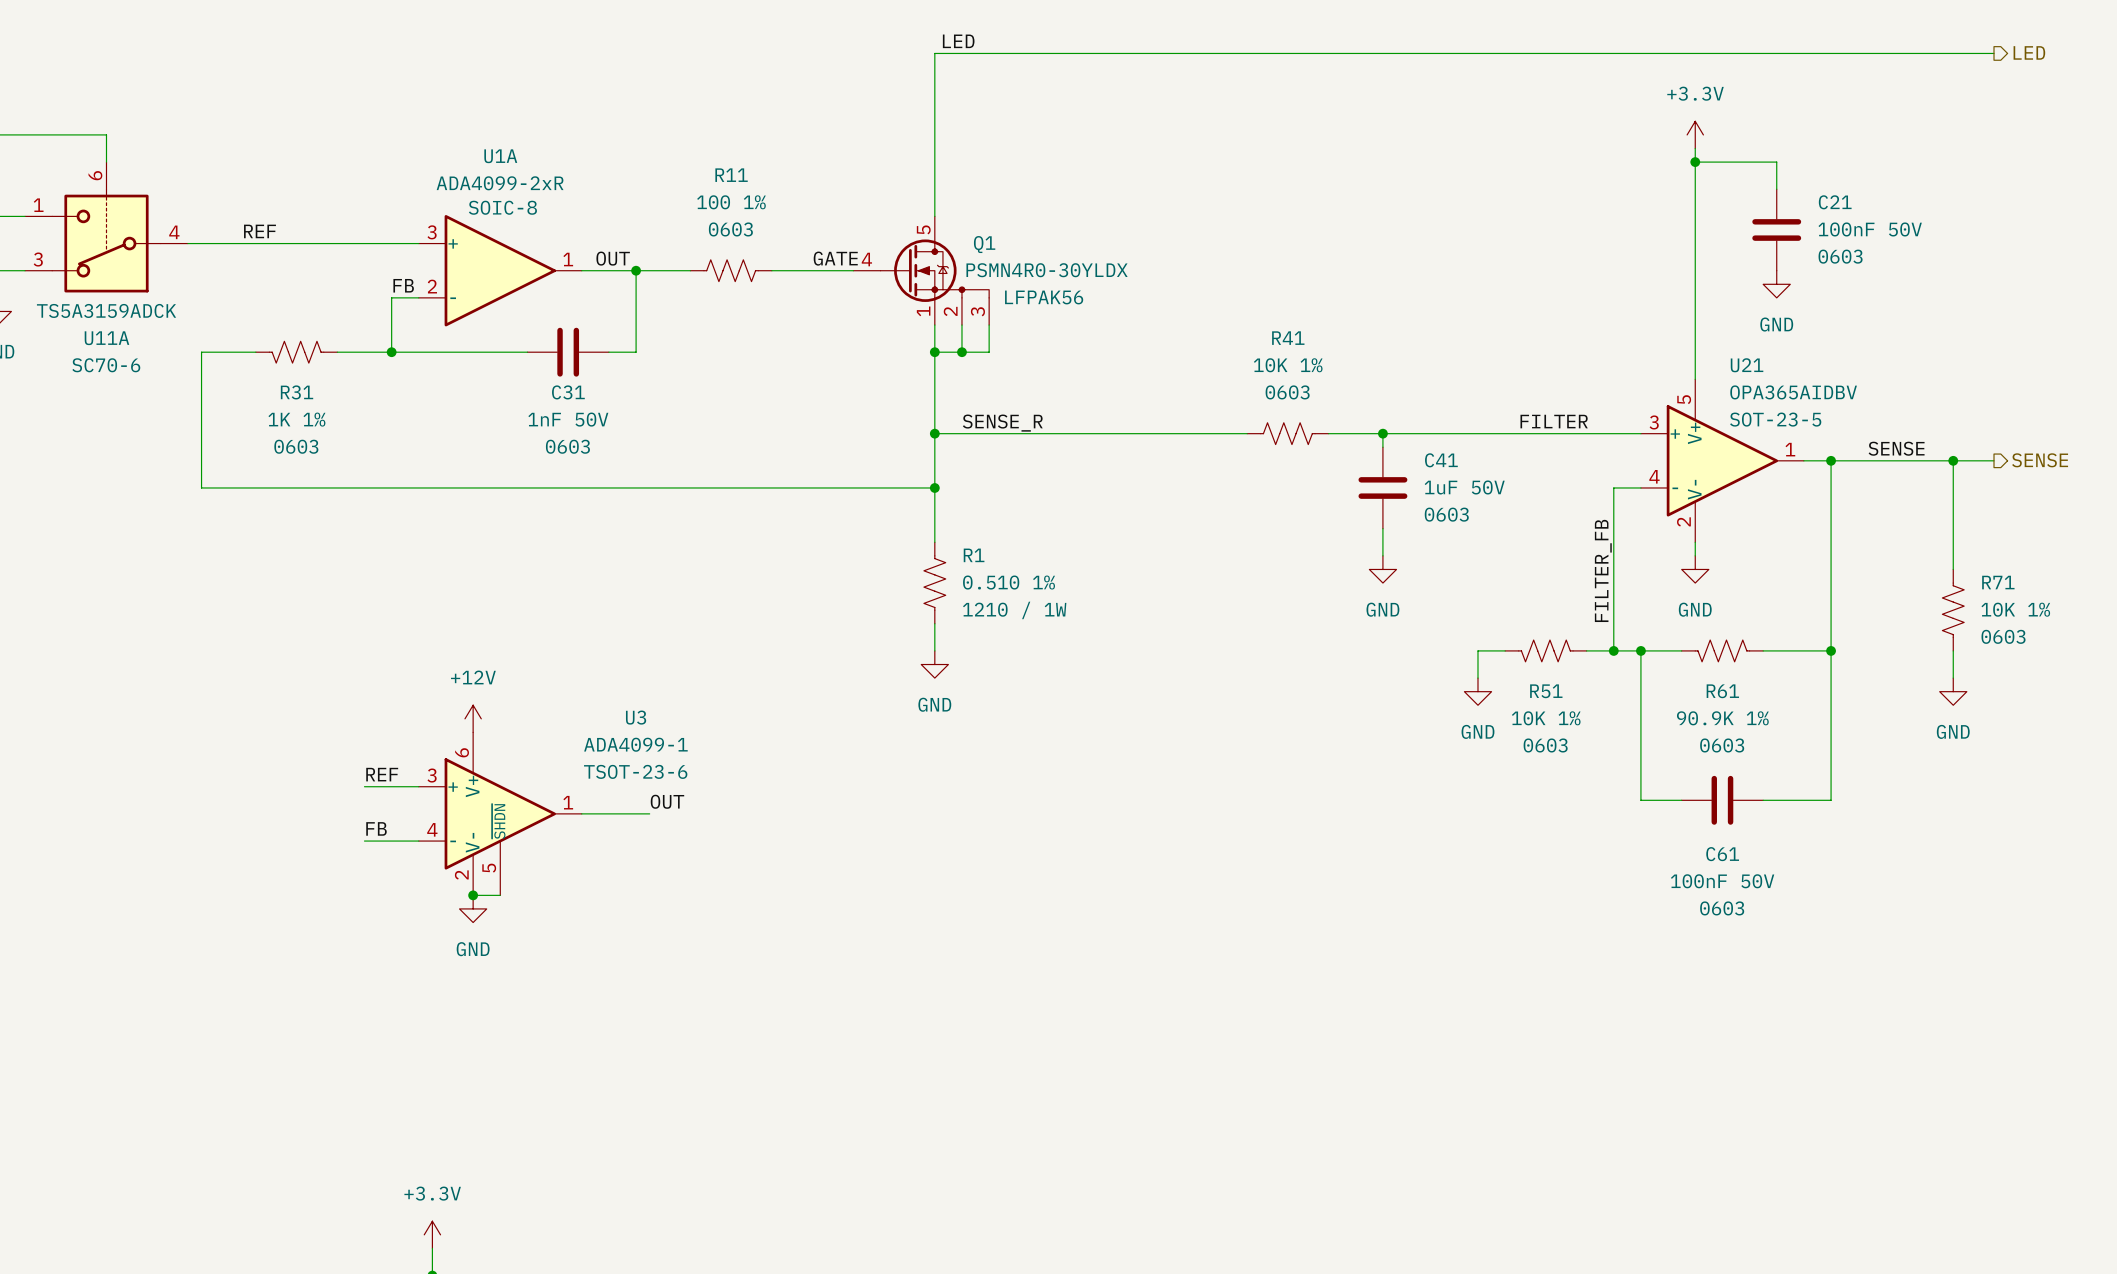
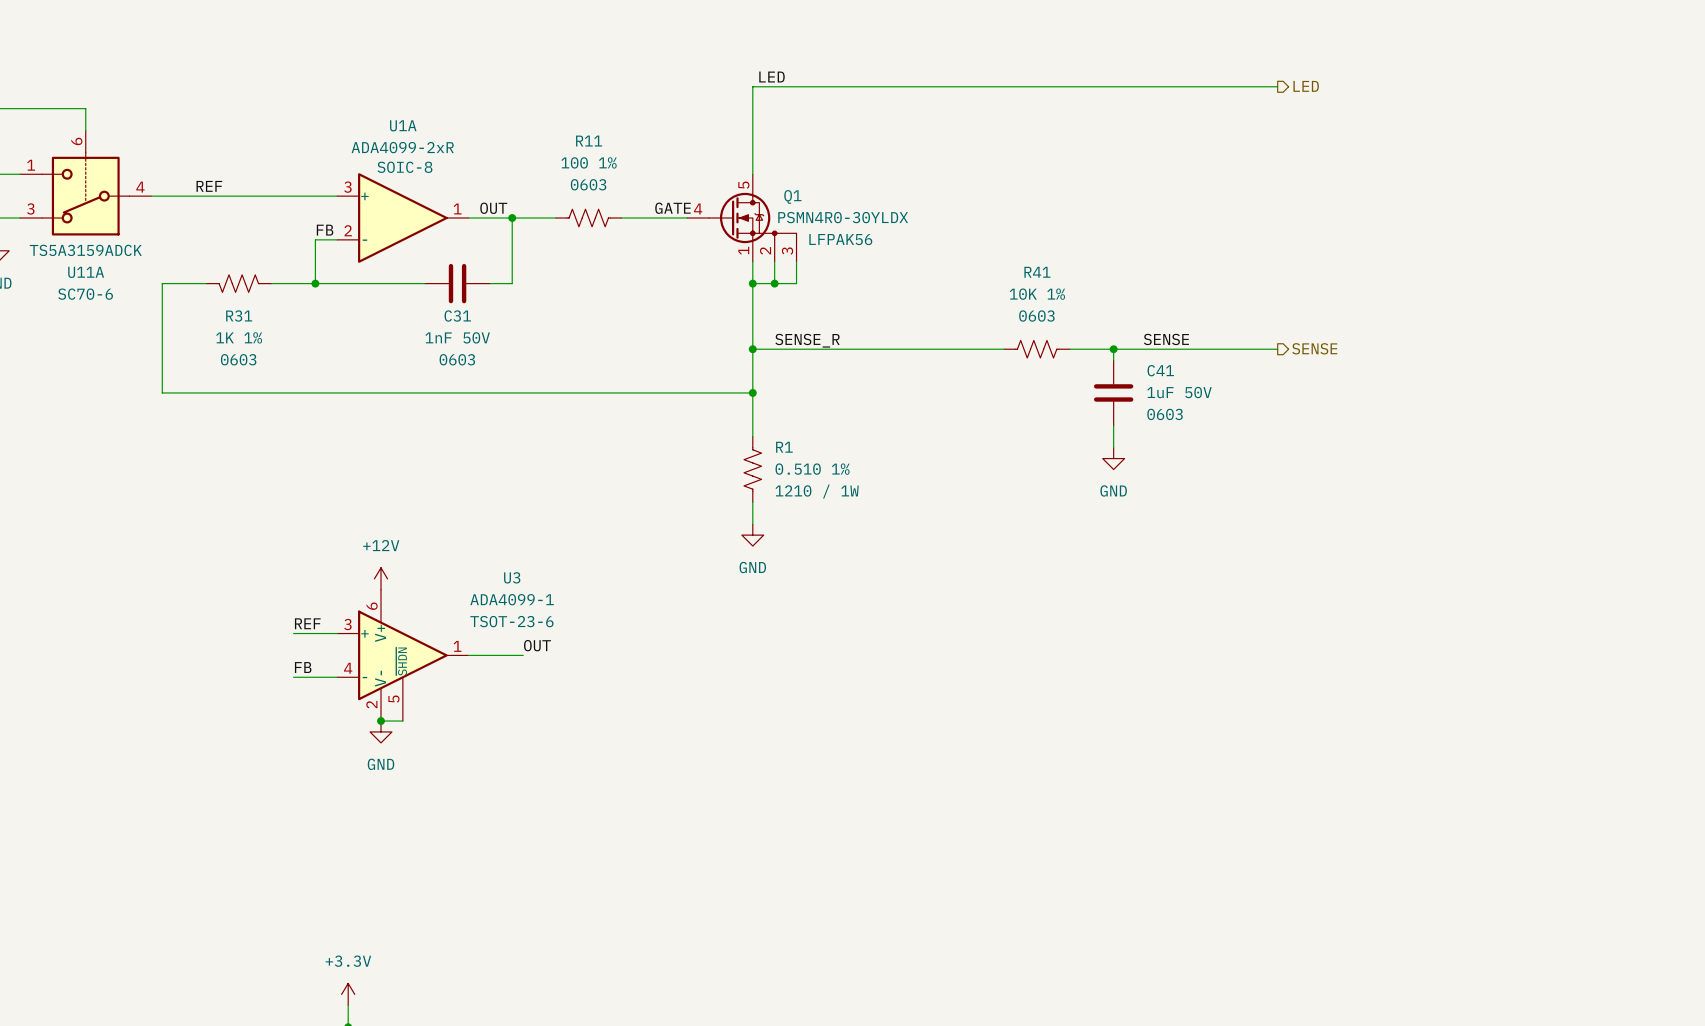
label position: LED (958, 41) -> LED (772, 77)
hierarchical label: LED (2029, 52) -> none
wire: (1994, 53) (934, 53) (934, 107) -> (1277, 86) (752, 86)
hierarchical label: none -> LED (1306, 86)
power symbol: +3.3V (1695, 134) -> none
wire: (1695, 148) (1695, 379) -> none
wire: (1695, 162) (1776, 162) (1776, 189) -> none
junction: (1695, 162) -> none
C21: 100nF 50V (1776, 229) -> none
power symbol: GND (1776, 284) -> none
label: none -> SENSE (1166, 339)
label: FILTER (1554, 421) -> none
wire: (1586, 433) (1640, 433) -> none
hierarchical label: none -> SENSE (1314, 348)
label: SENSE (1896, 448) -> none
U21: OPA365AIDBV (1722, 460) -> none
wire: (1803, 460) (1994, 460) -> none
wire: (1831, 460) (1831, 800) (1763, 800) -> none
junction: (1831, 460) -> none
wire: (1953, 460) (1953, 569) -> none
junction: (1953, 460) -> none
hierarchical label: SENSE (2040, 460) -> none
wire: (1640, 487) (1613, 487) (1613, 650) -> none
wire: (1695, 542) (1695, 555) -> none
power symbol: GND (1695, 569) -> none
label: FILTER_FB (1603, 570) -> none
R71: 10K 1% (1953, 610) -> none
wire: (1505, 650) (1477, 650) (1477, 678) -> none
R51: 10K 1% (1545, 650) -> none
wire: (1586, 650) (1681, 650) -> none
junction: (1613, 650) -> none
wire: (1640, 650) (1640, 800) (1681, 800) -> none
junction: (1640, 650) -> none
R61: 90.9K 1% (1722, 650) -> none
wire: (1763, 650) (1831, 650) -> none
junction: (1831, 650) -> none
wire: (1953, 650) (1953, 678) -> none
power symbol: GND (1477, 691) -> none
power symbol: GND (1953, 691) -> none
C61: 100nF 50V (1722, 800) -> none

